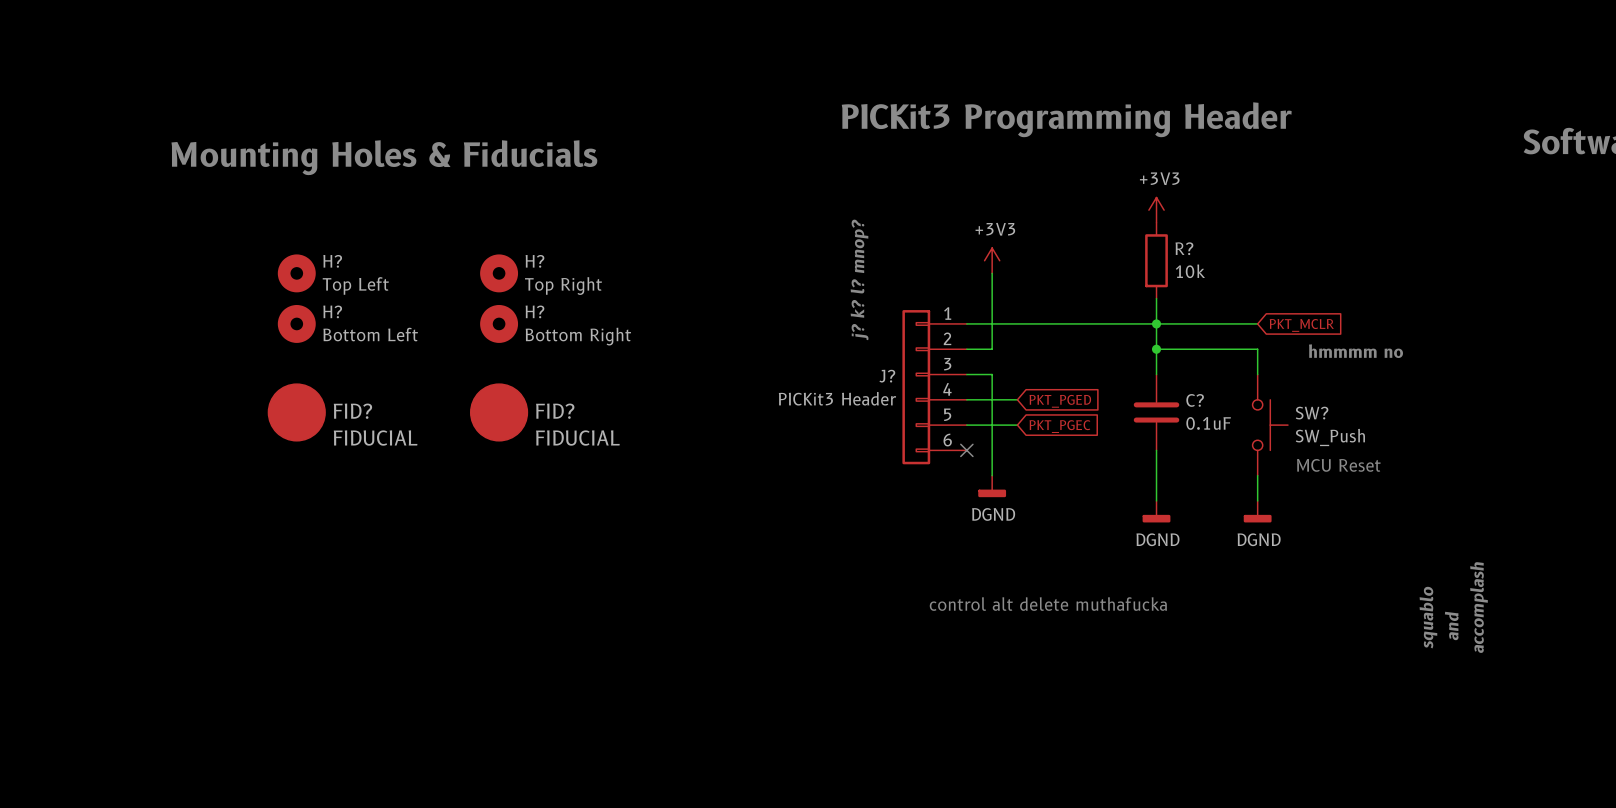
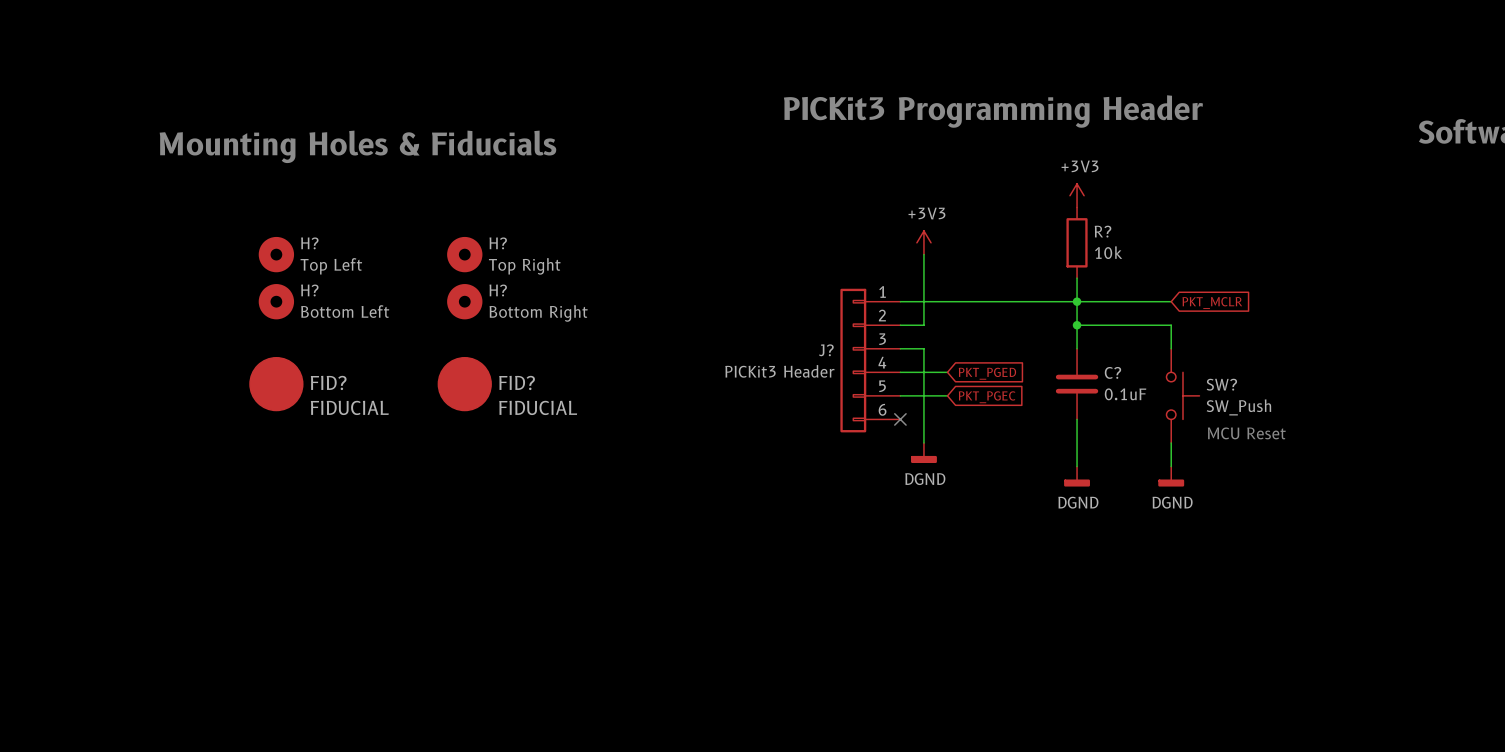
text: j? k? l? mnop? (859, 279) -> none
text: hmmmm no (1356, 351) -> none
text: control alt delete muthafucka (1048, 604) -> none
text: accomplash (1479, 607) -> none
text: squablo (1428, 617) -> none
text: and (1451, 626) -> none

